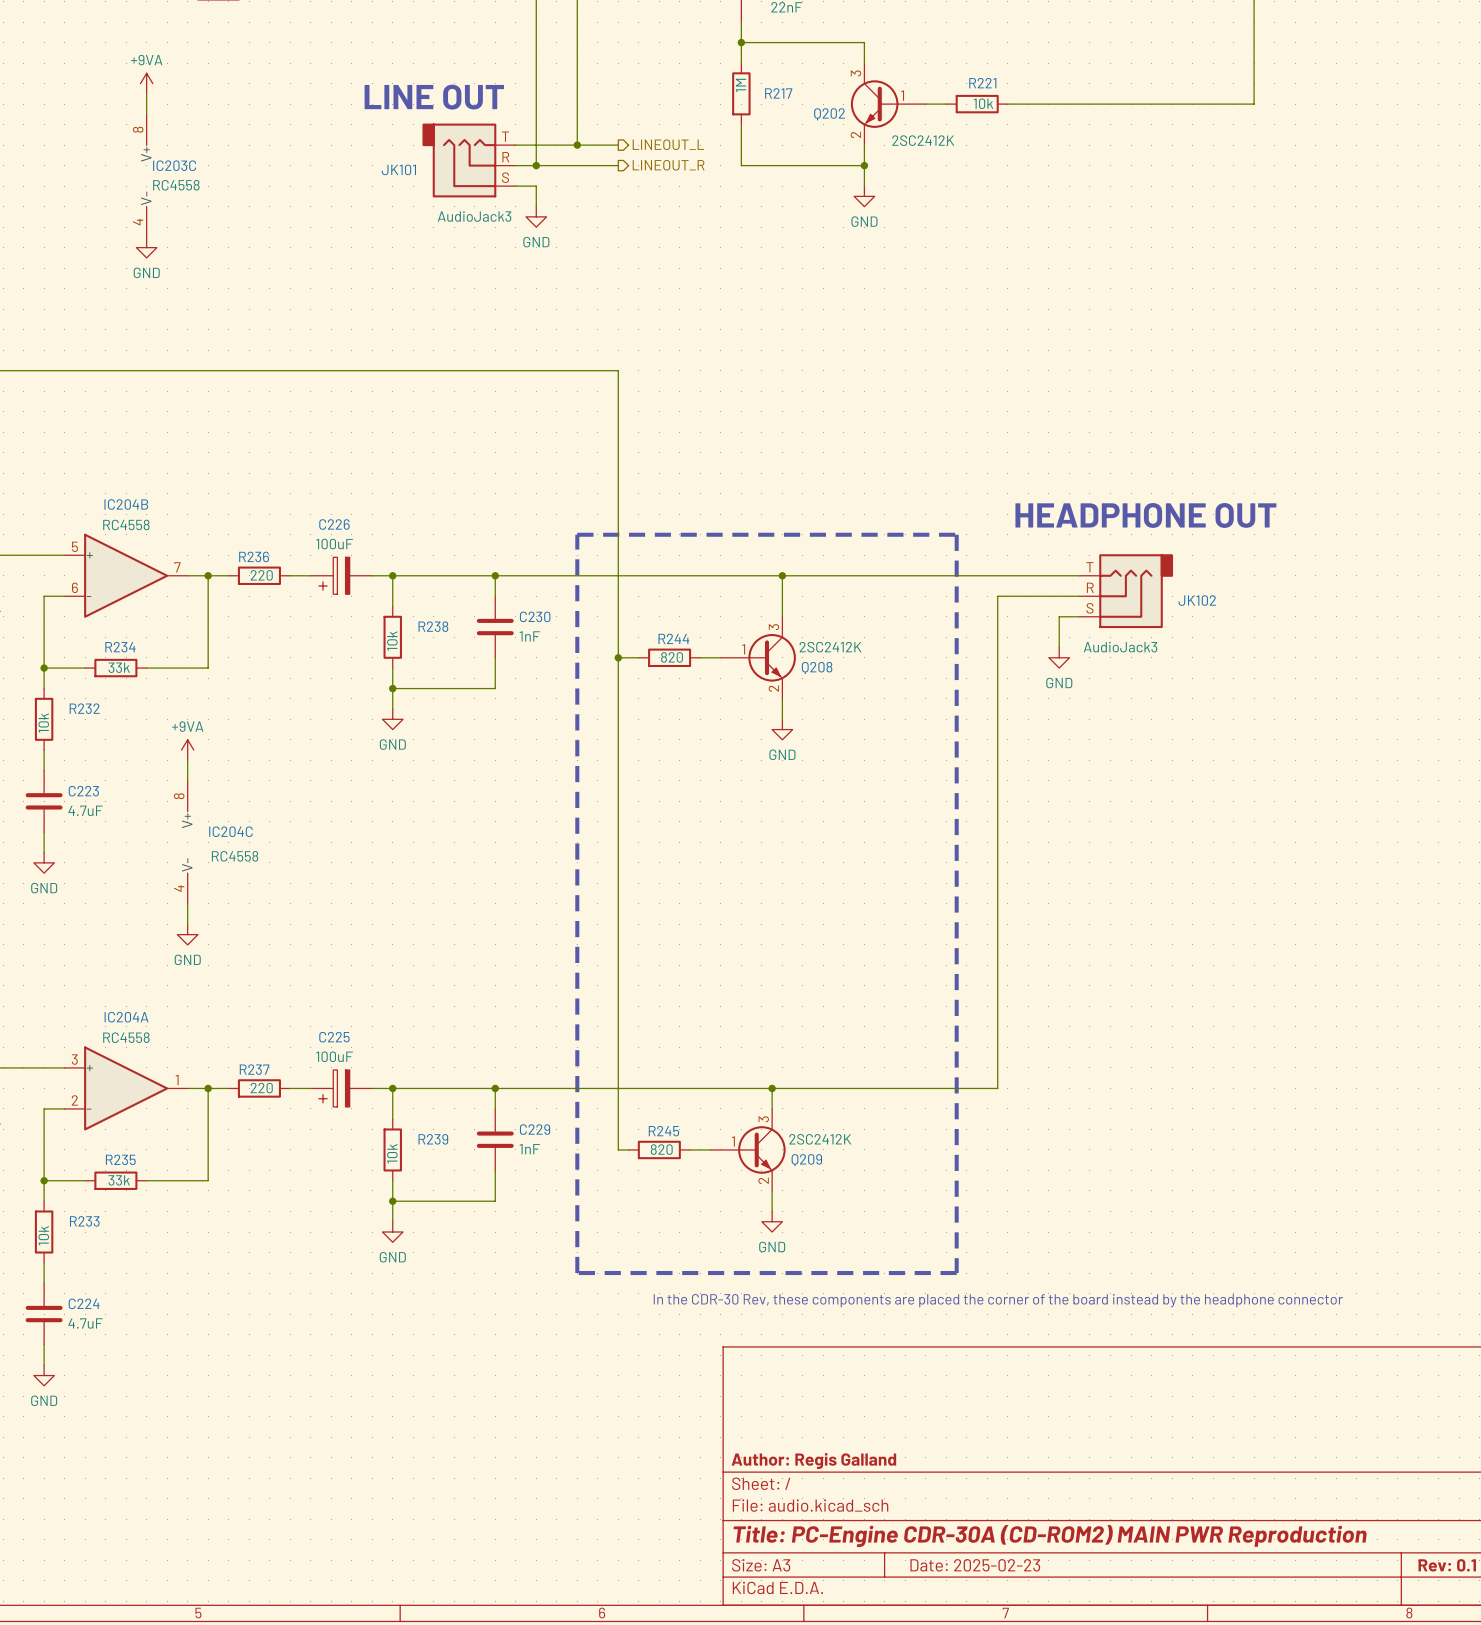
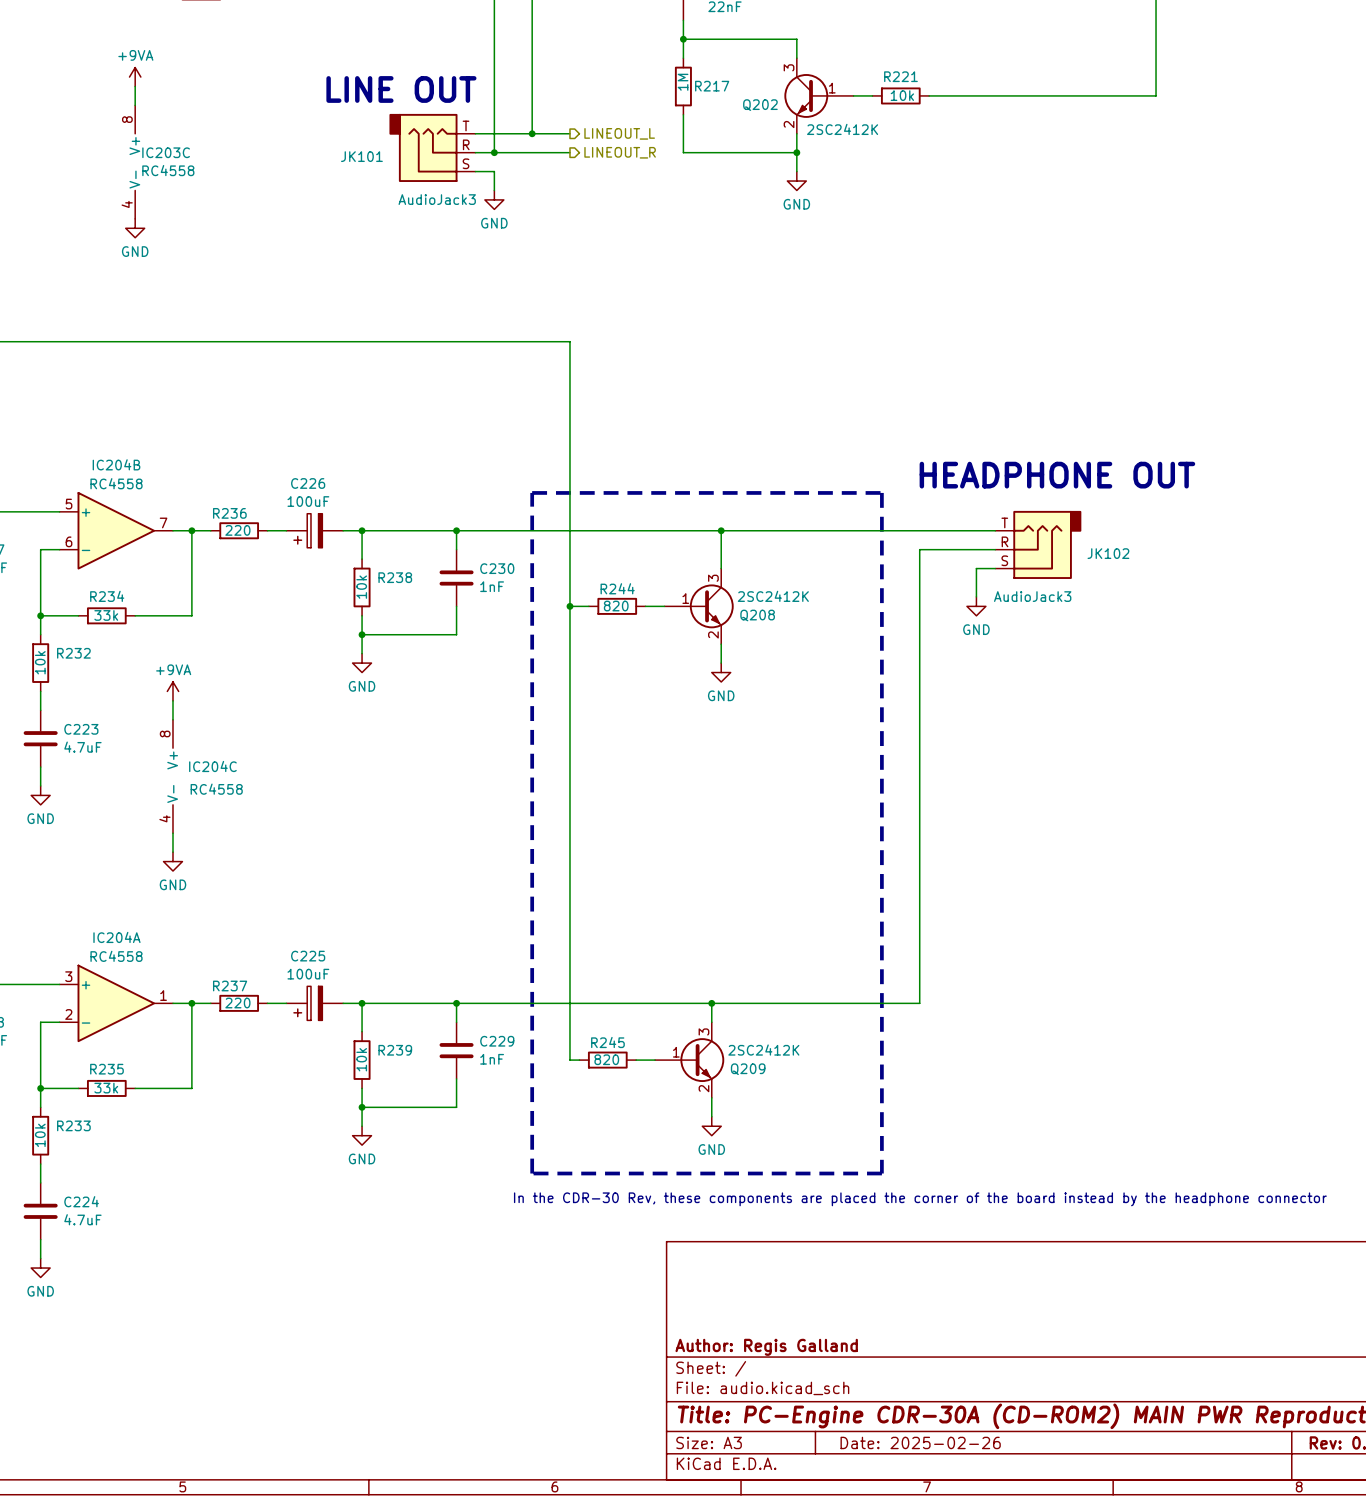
title block: Date: 2025-02-23 (975, 1565) -> Date: 2025-02-26 (920, 1442)

